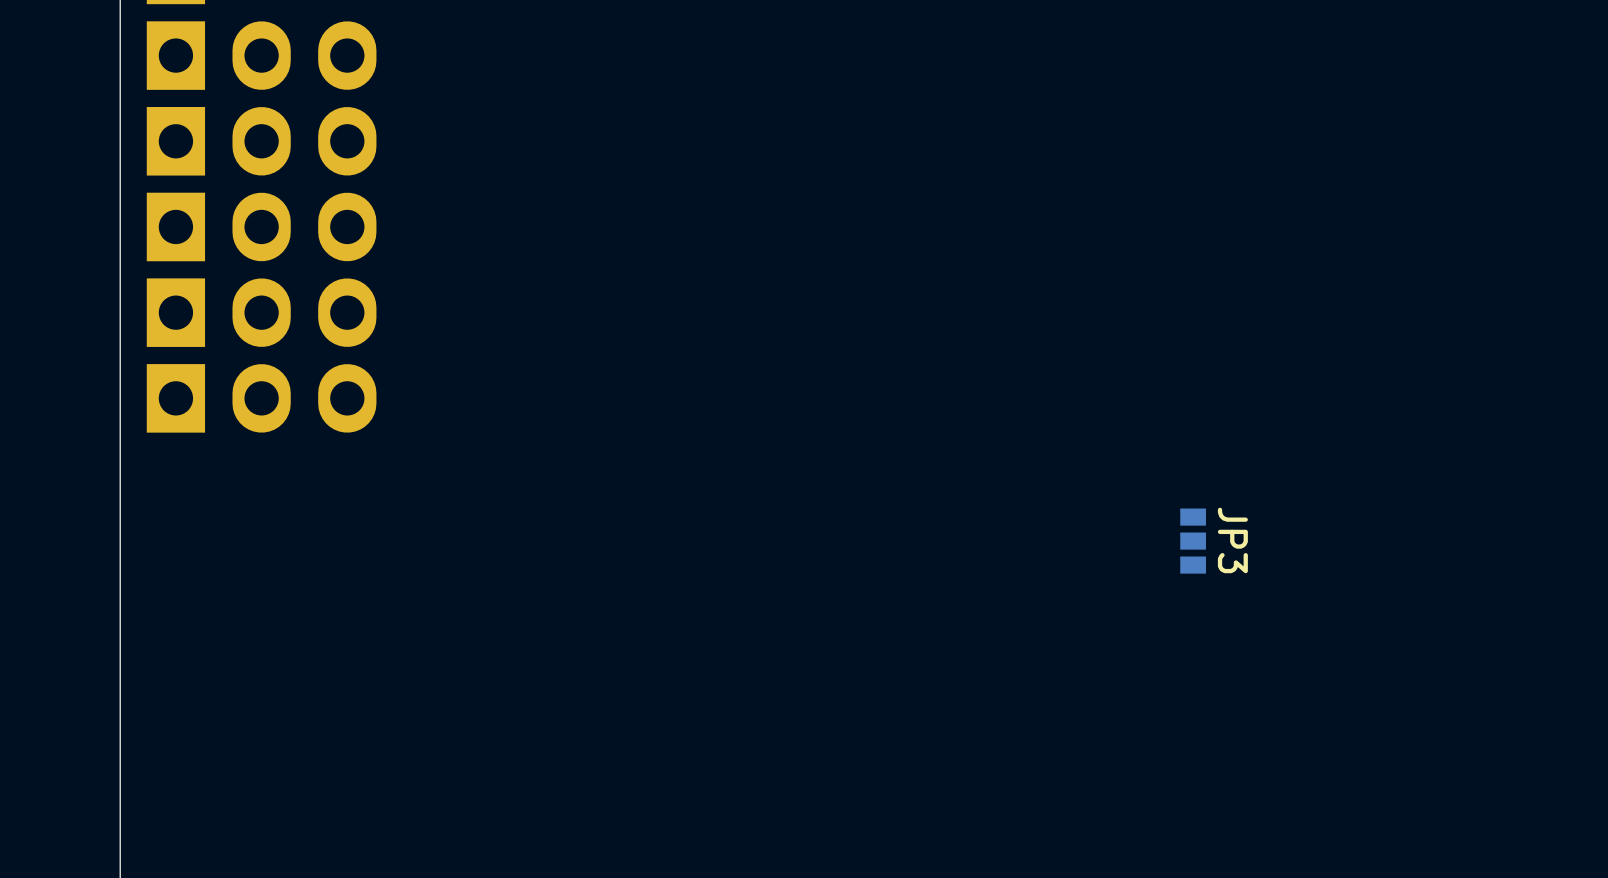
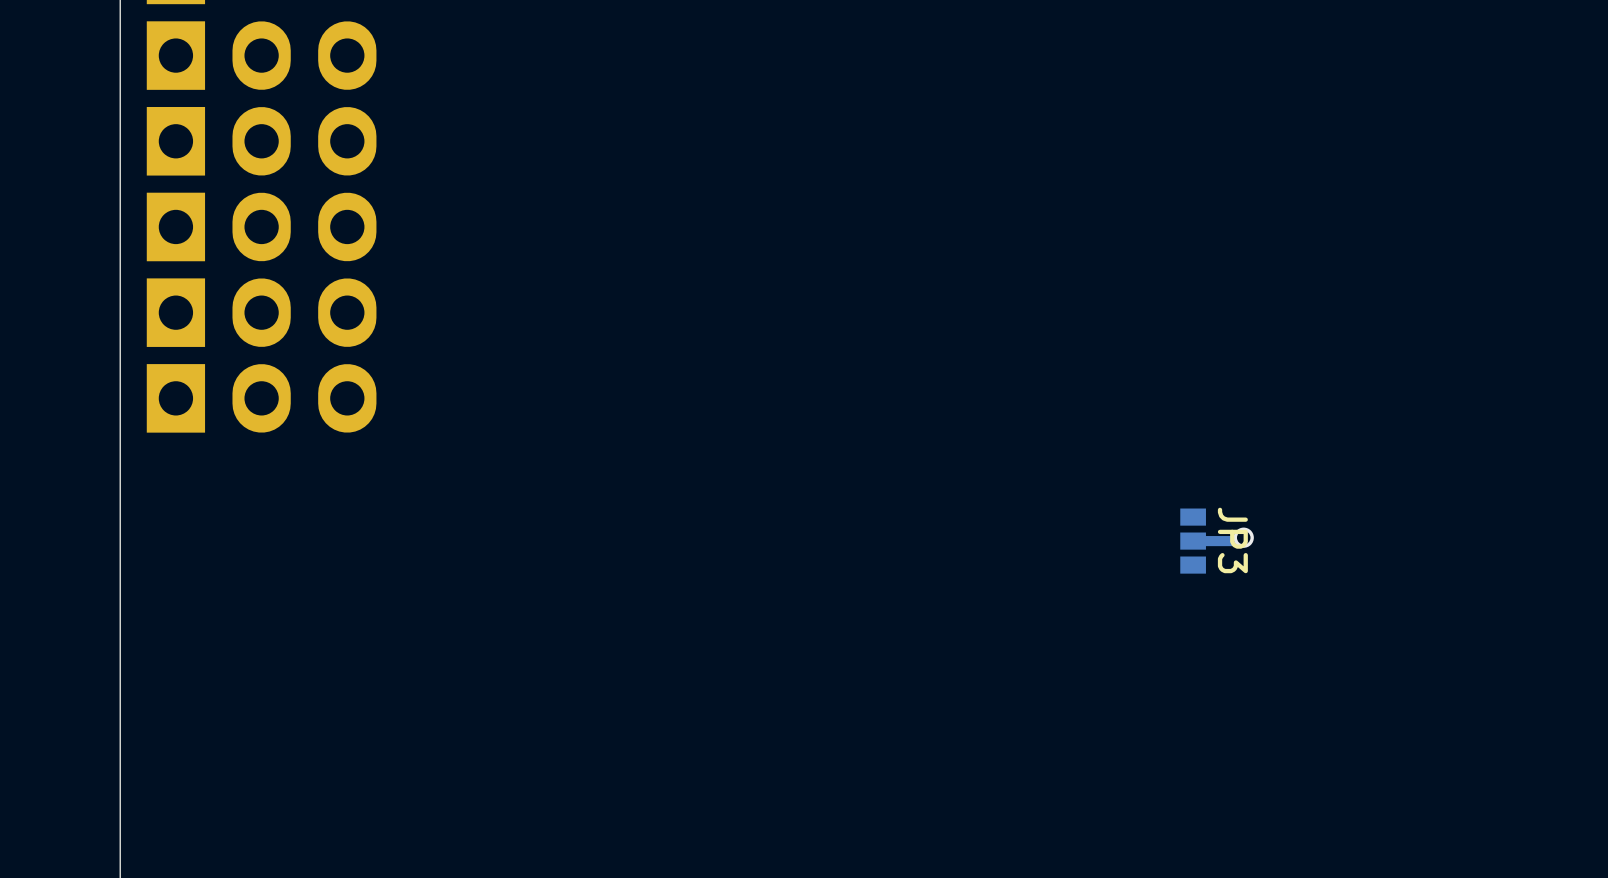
track: none -> (1243, 537) (1240, 541) (1193, 541)
via: none -> (1243, 537)

